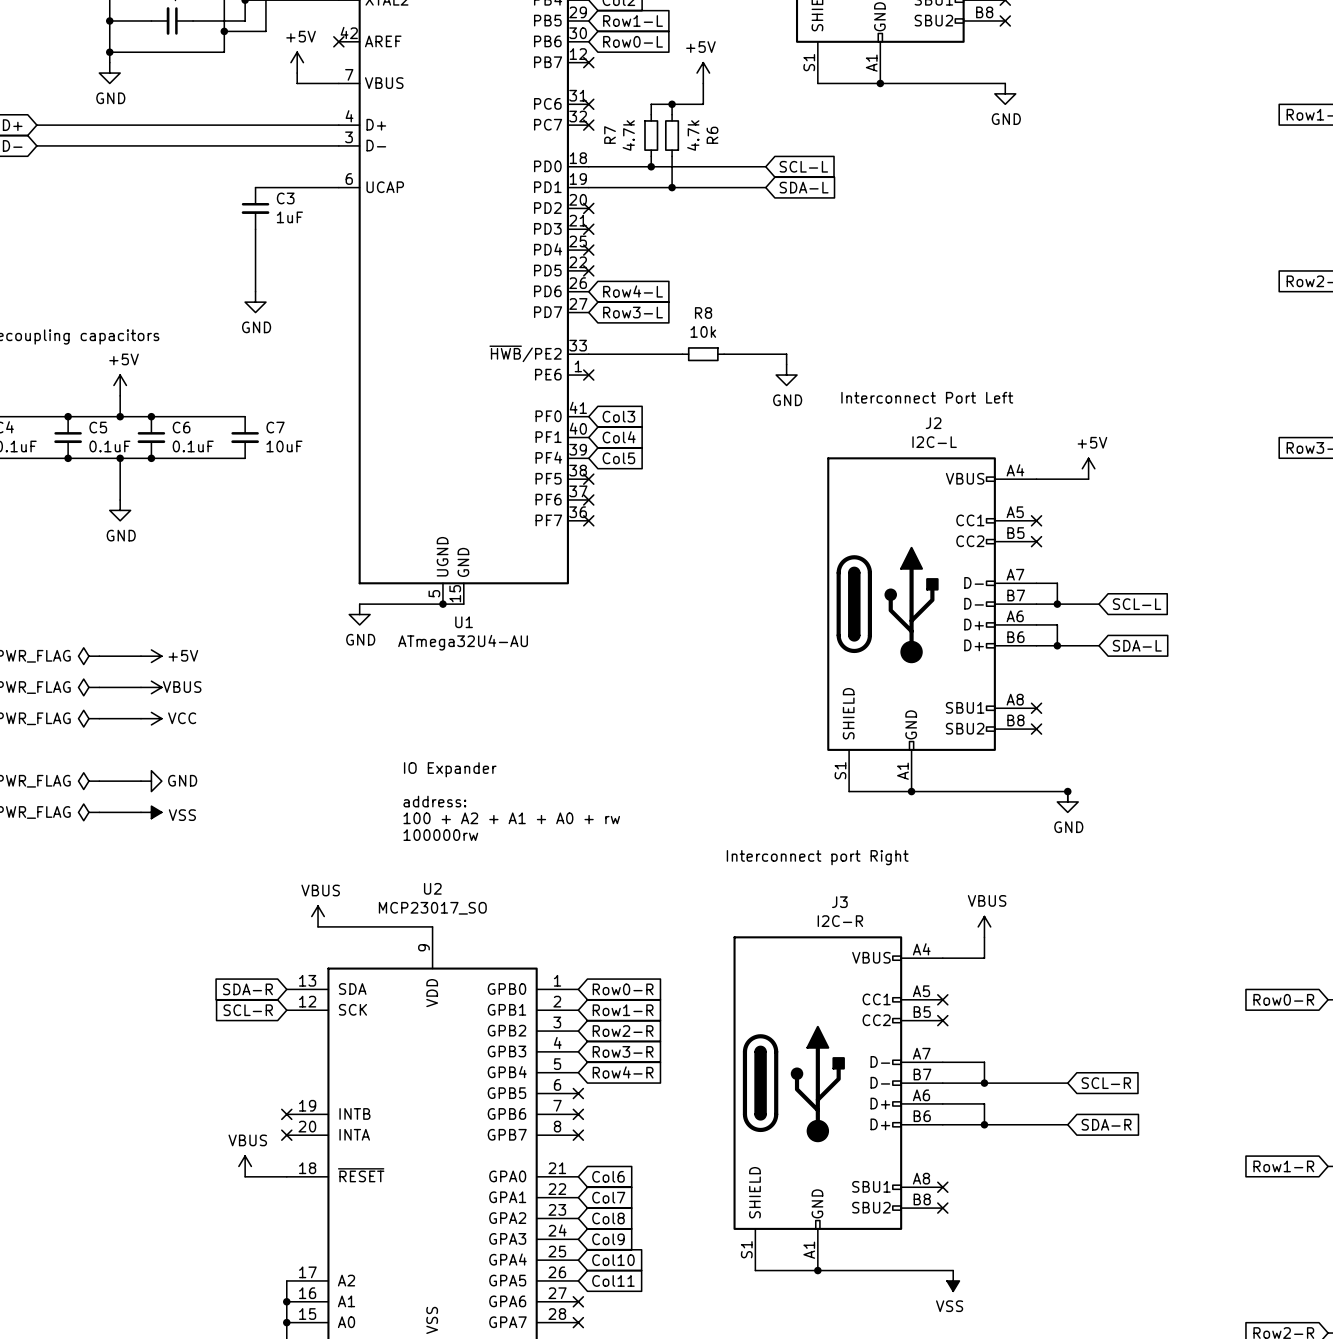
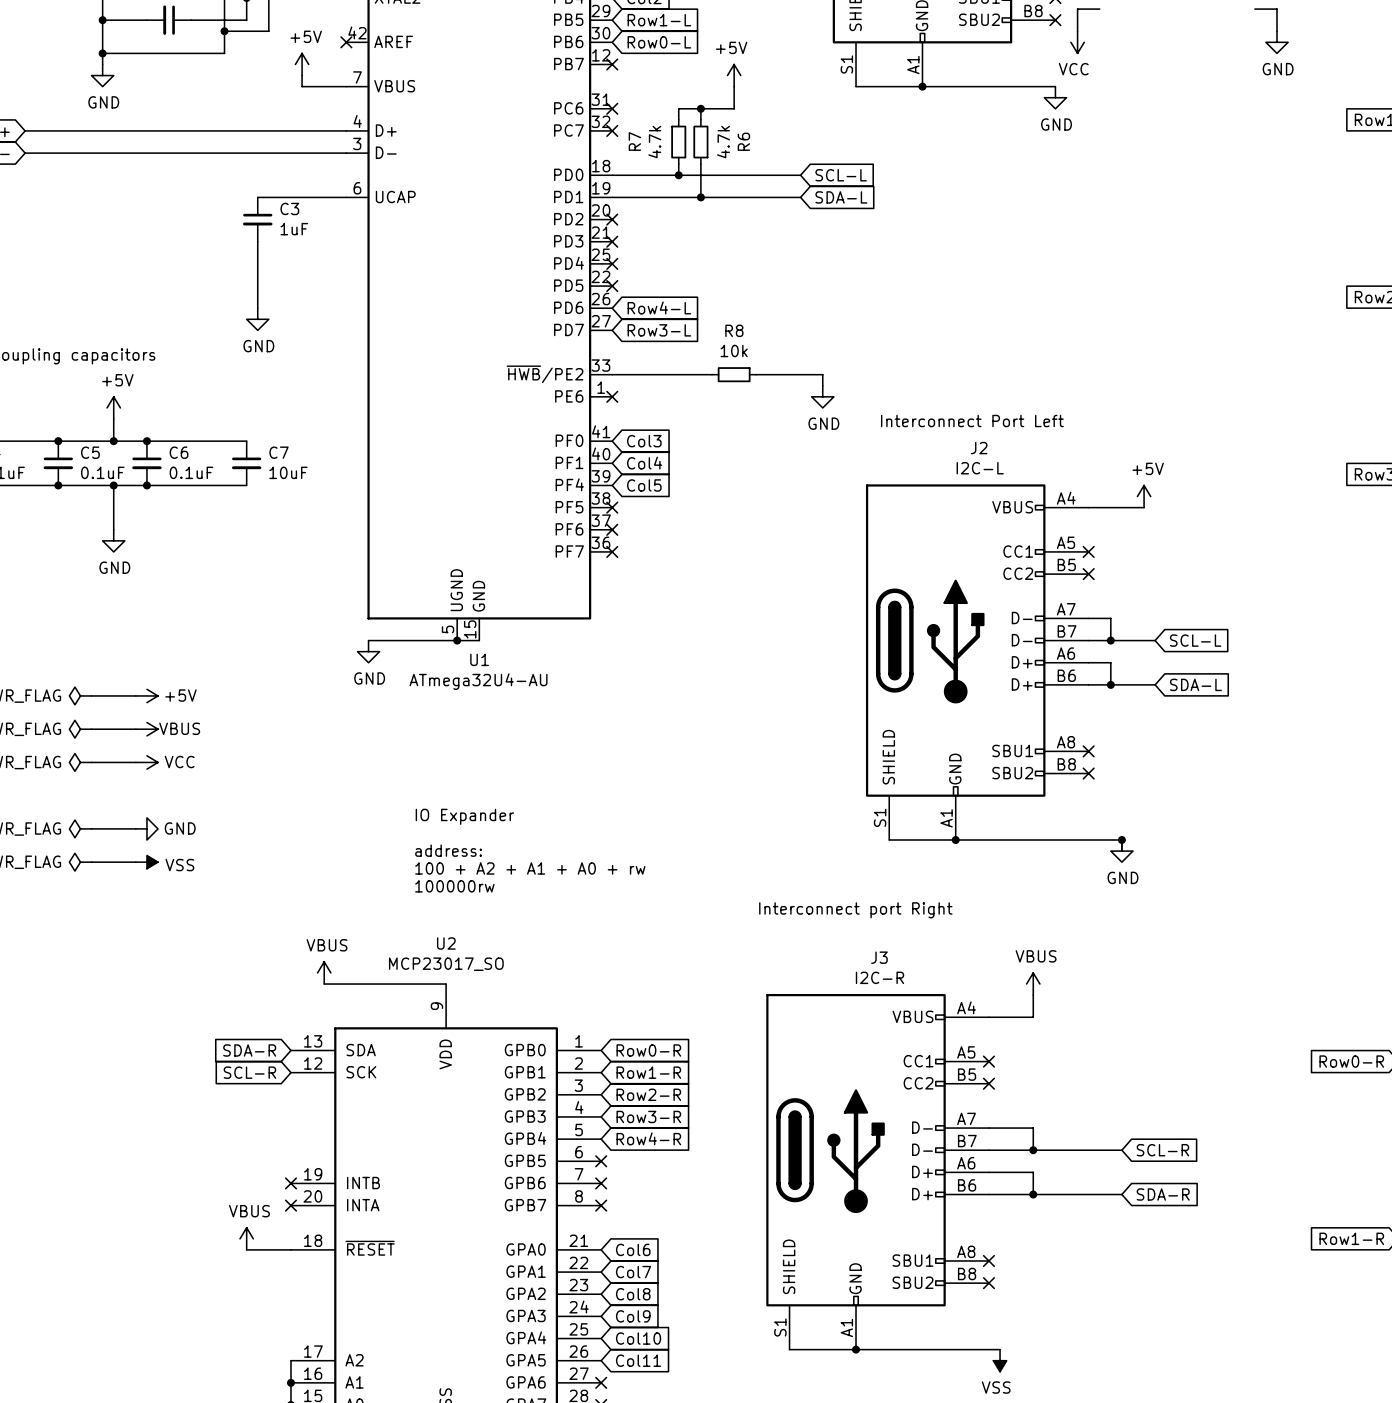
wire: none -> (1099, 9) (1077, 9) (1077, 31)
wire: none -> (1254, 9) (1277, 9) (1277, 31)
power symbol: none -> VCC (1077, 42)
power symbol: none -> GND (1277, 42)

